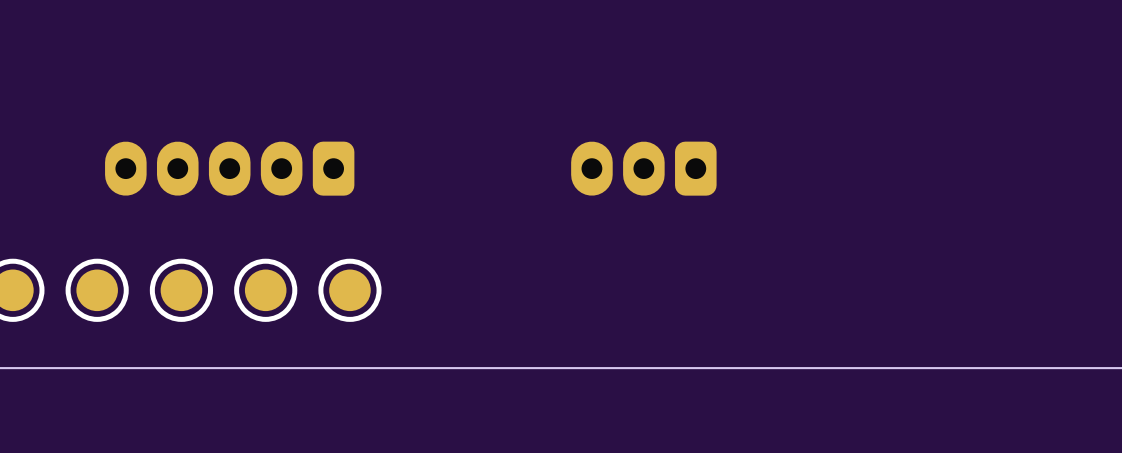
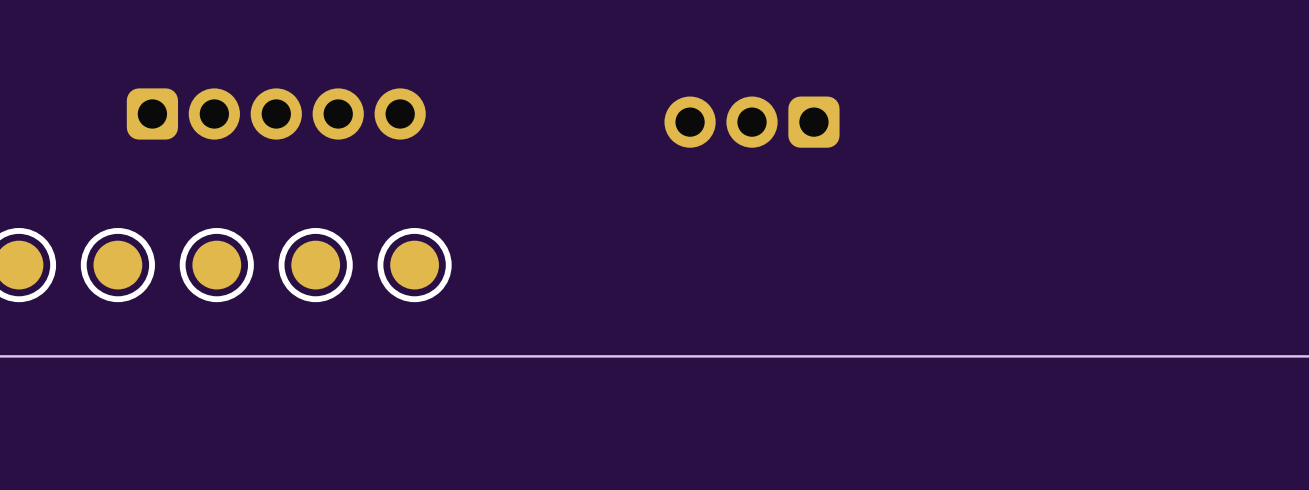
part footprint: [105, 141, 355, 196] -> [126, 88, 426, 140]
part footprint: [571, 141, 717, 196] -> [664, 96, 840, 148]

